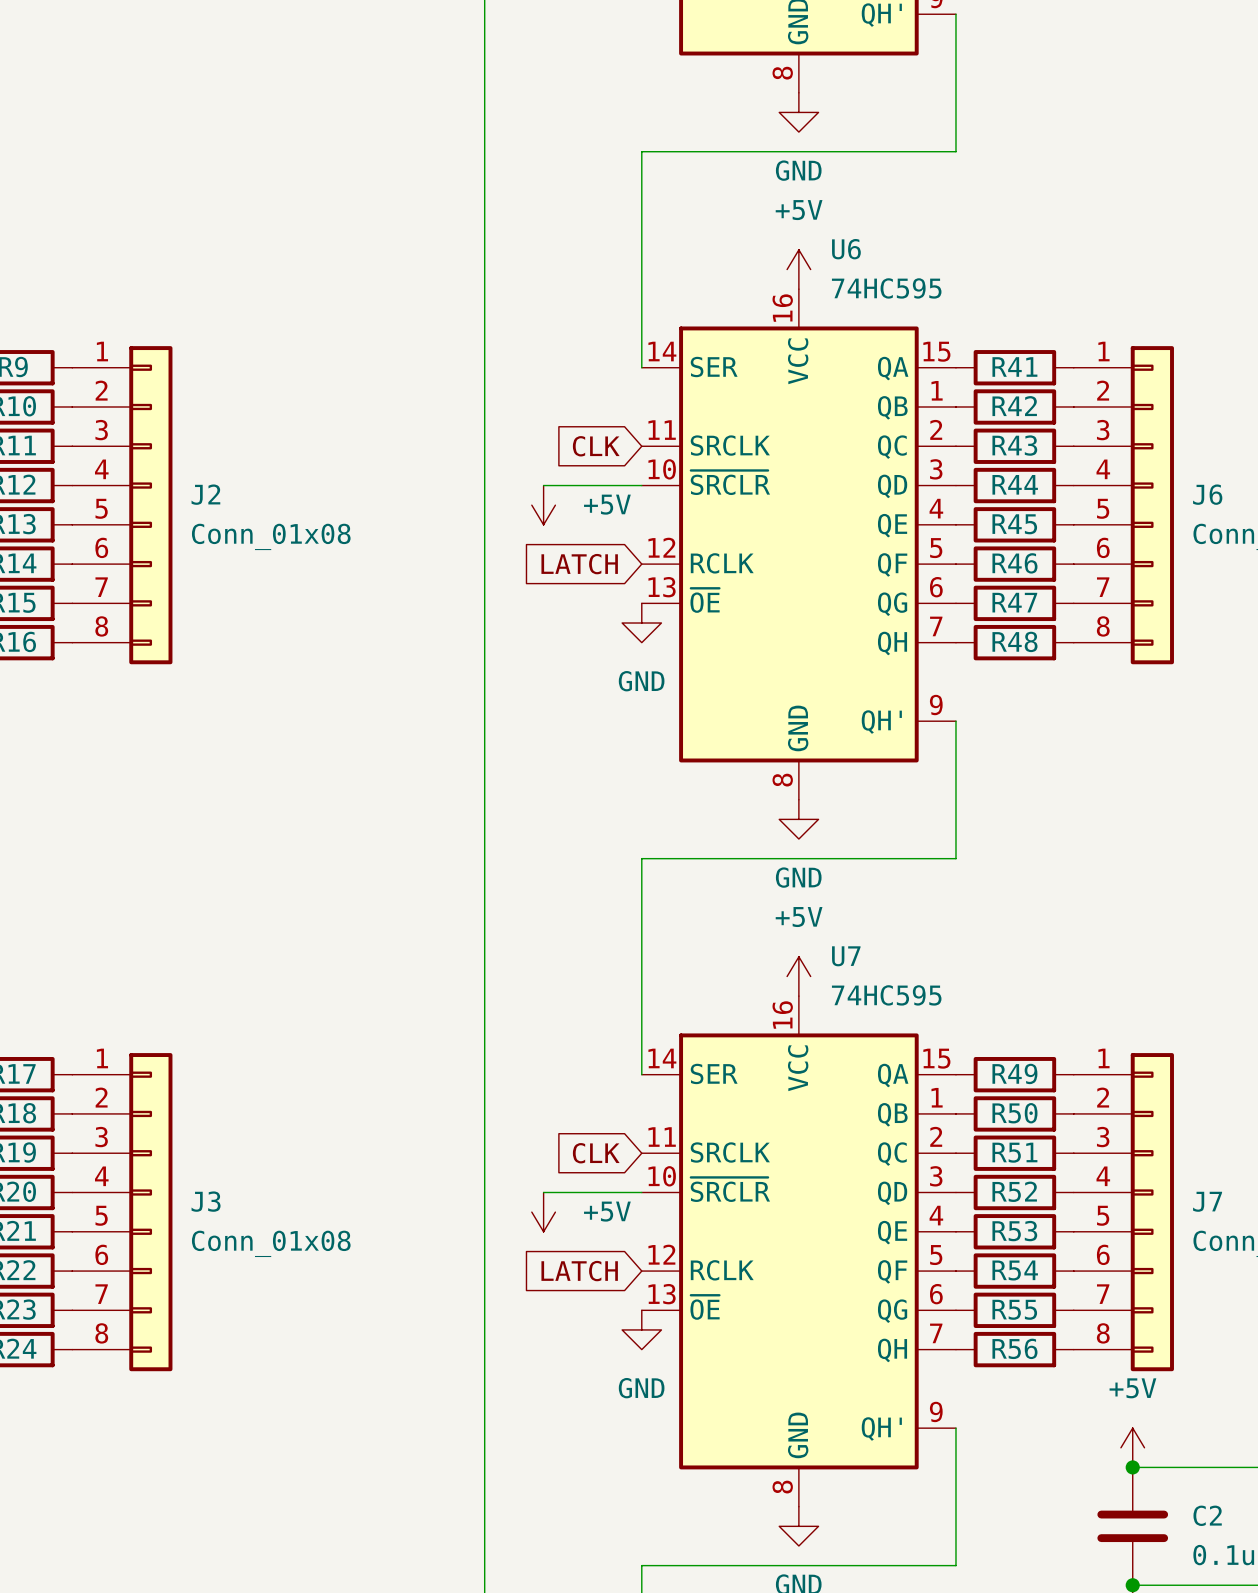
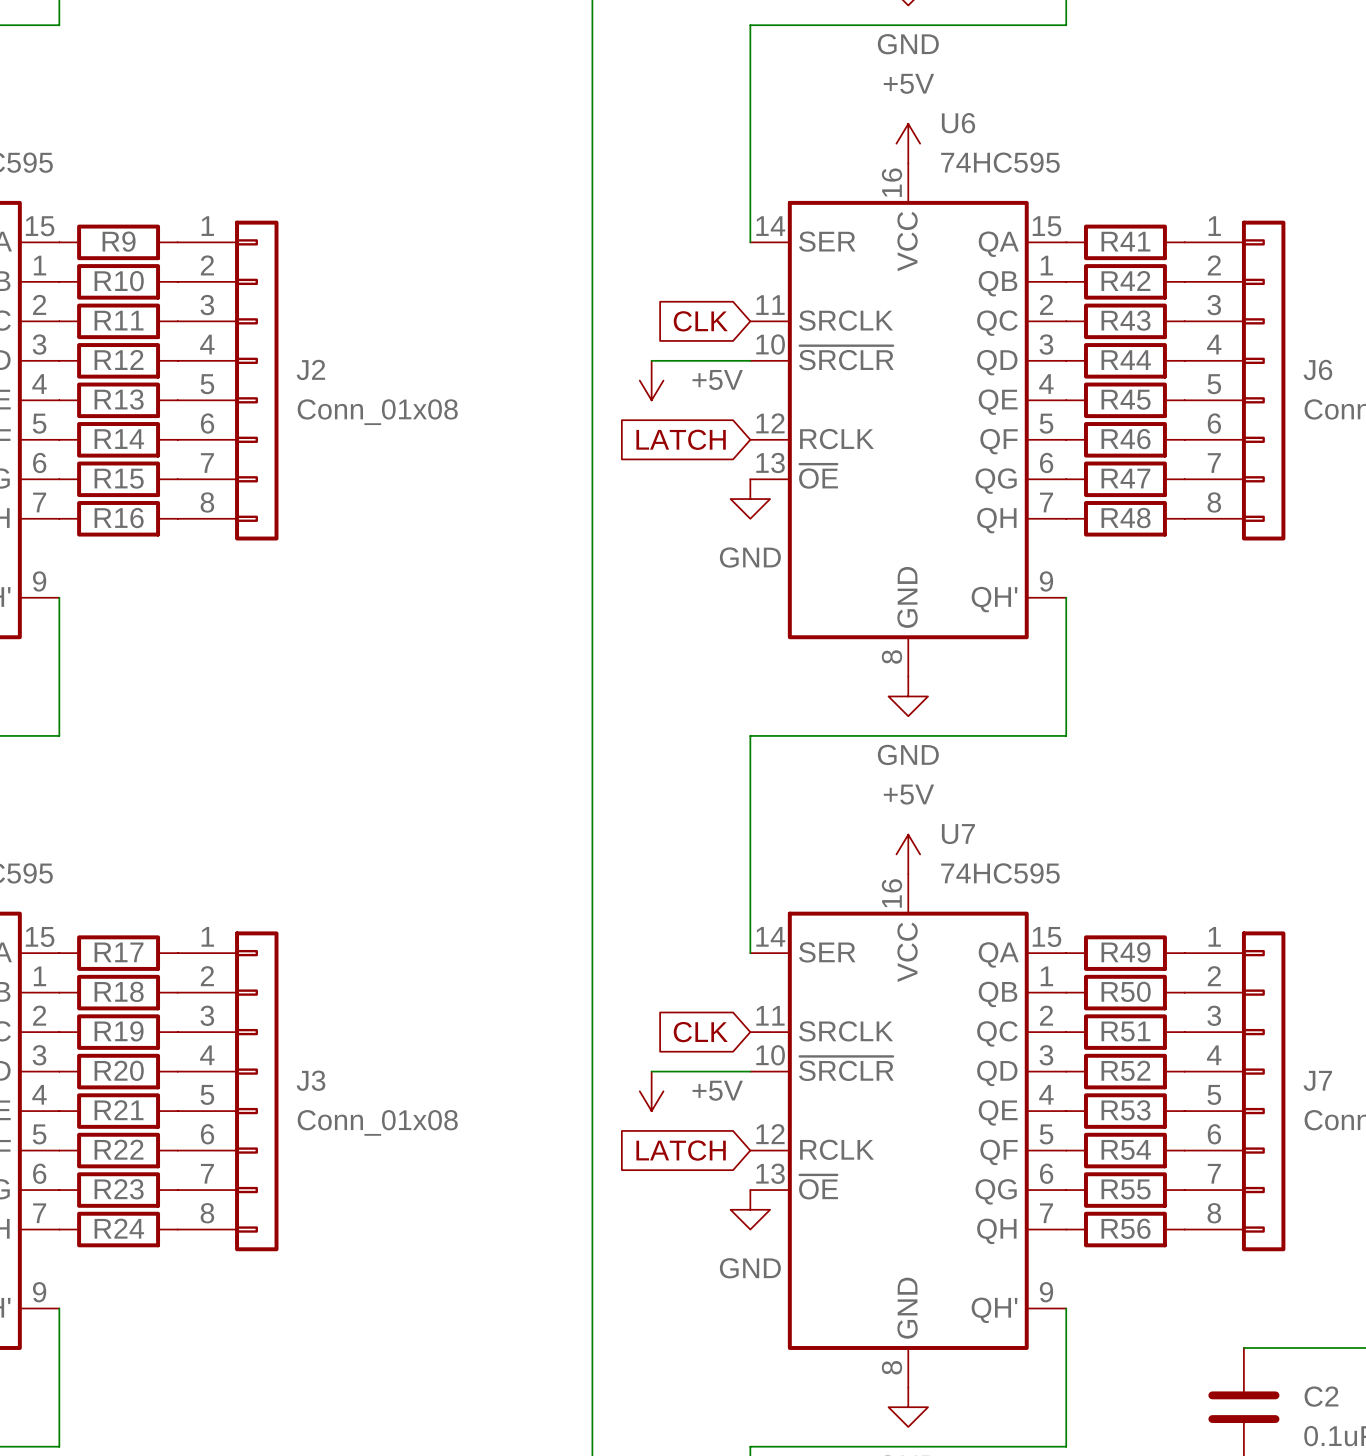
power symbol: +5V (1132, 1447) -> none
junction: (1132, 1467) -> none

